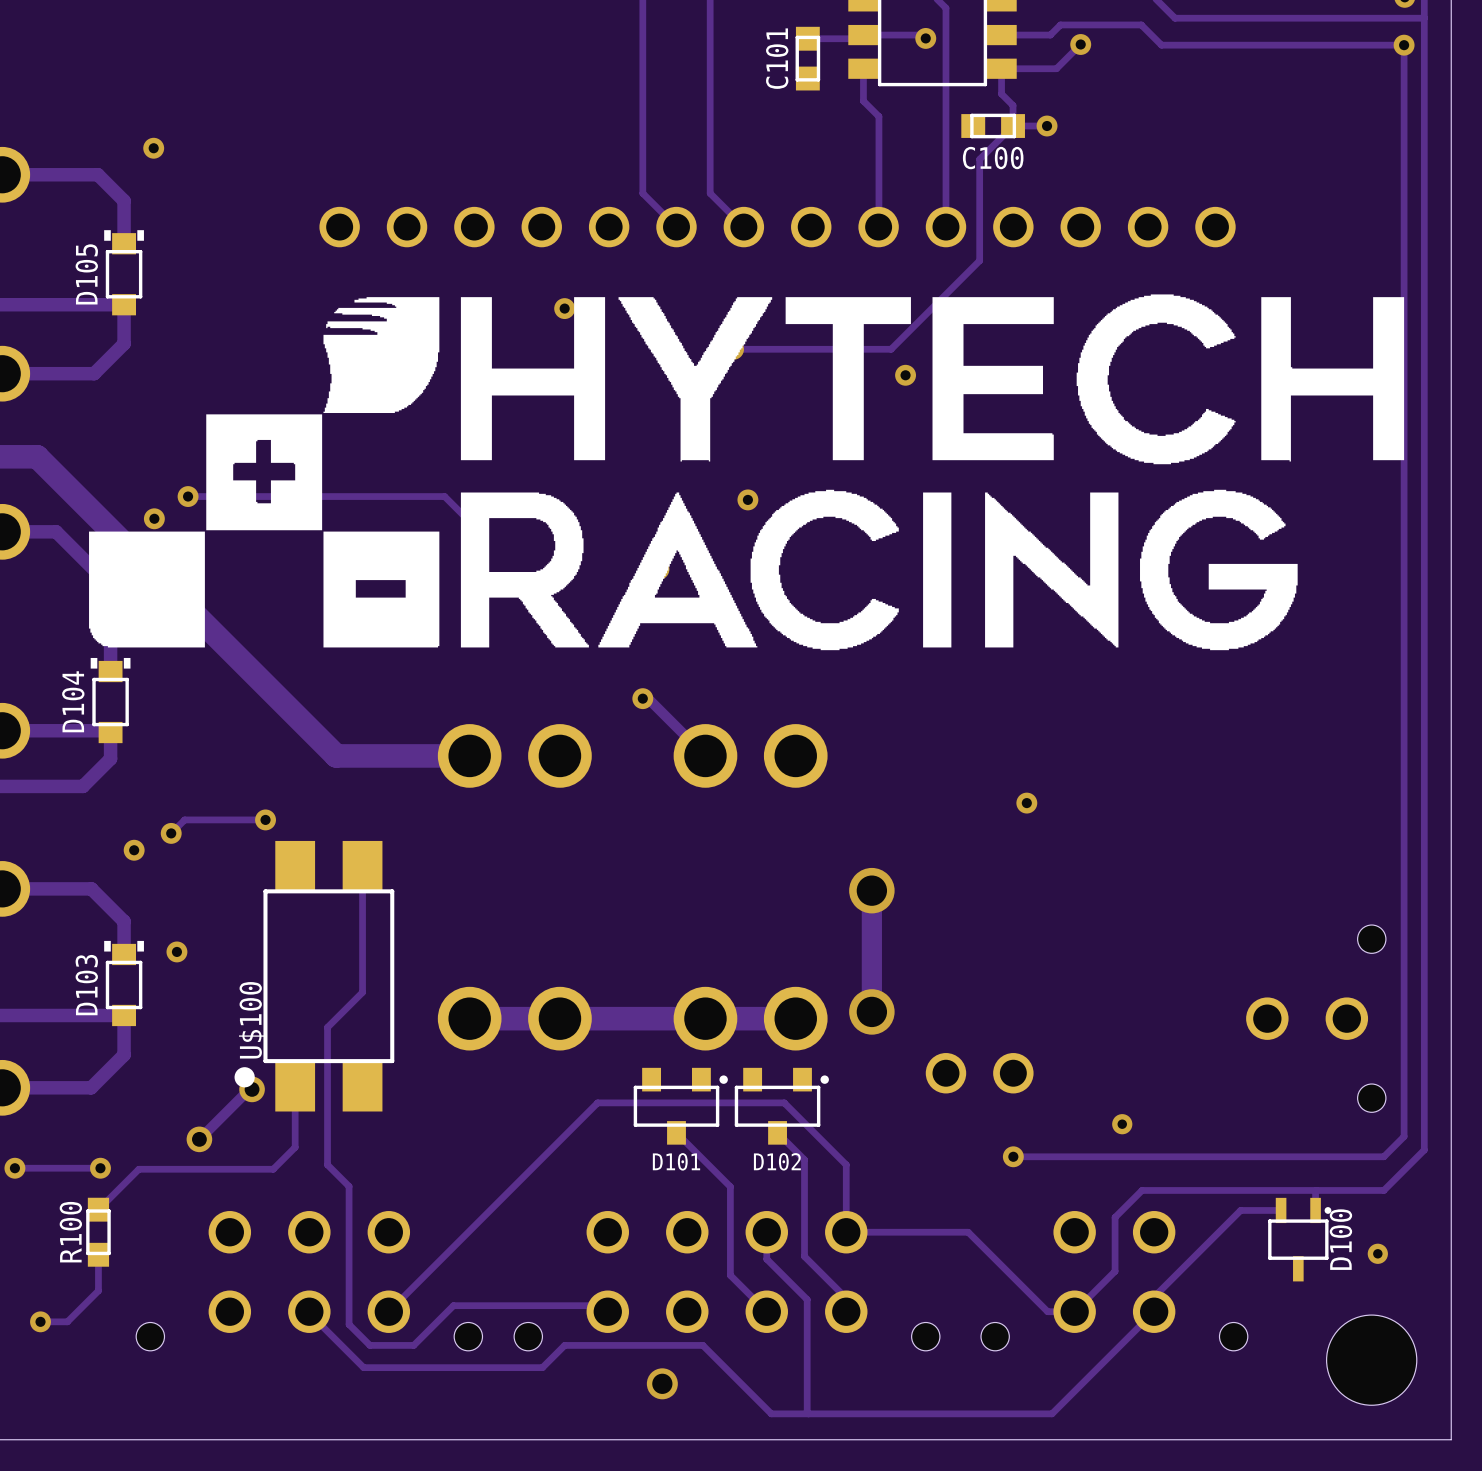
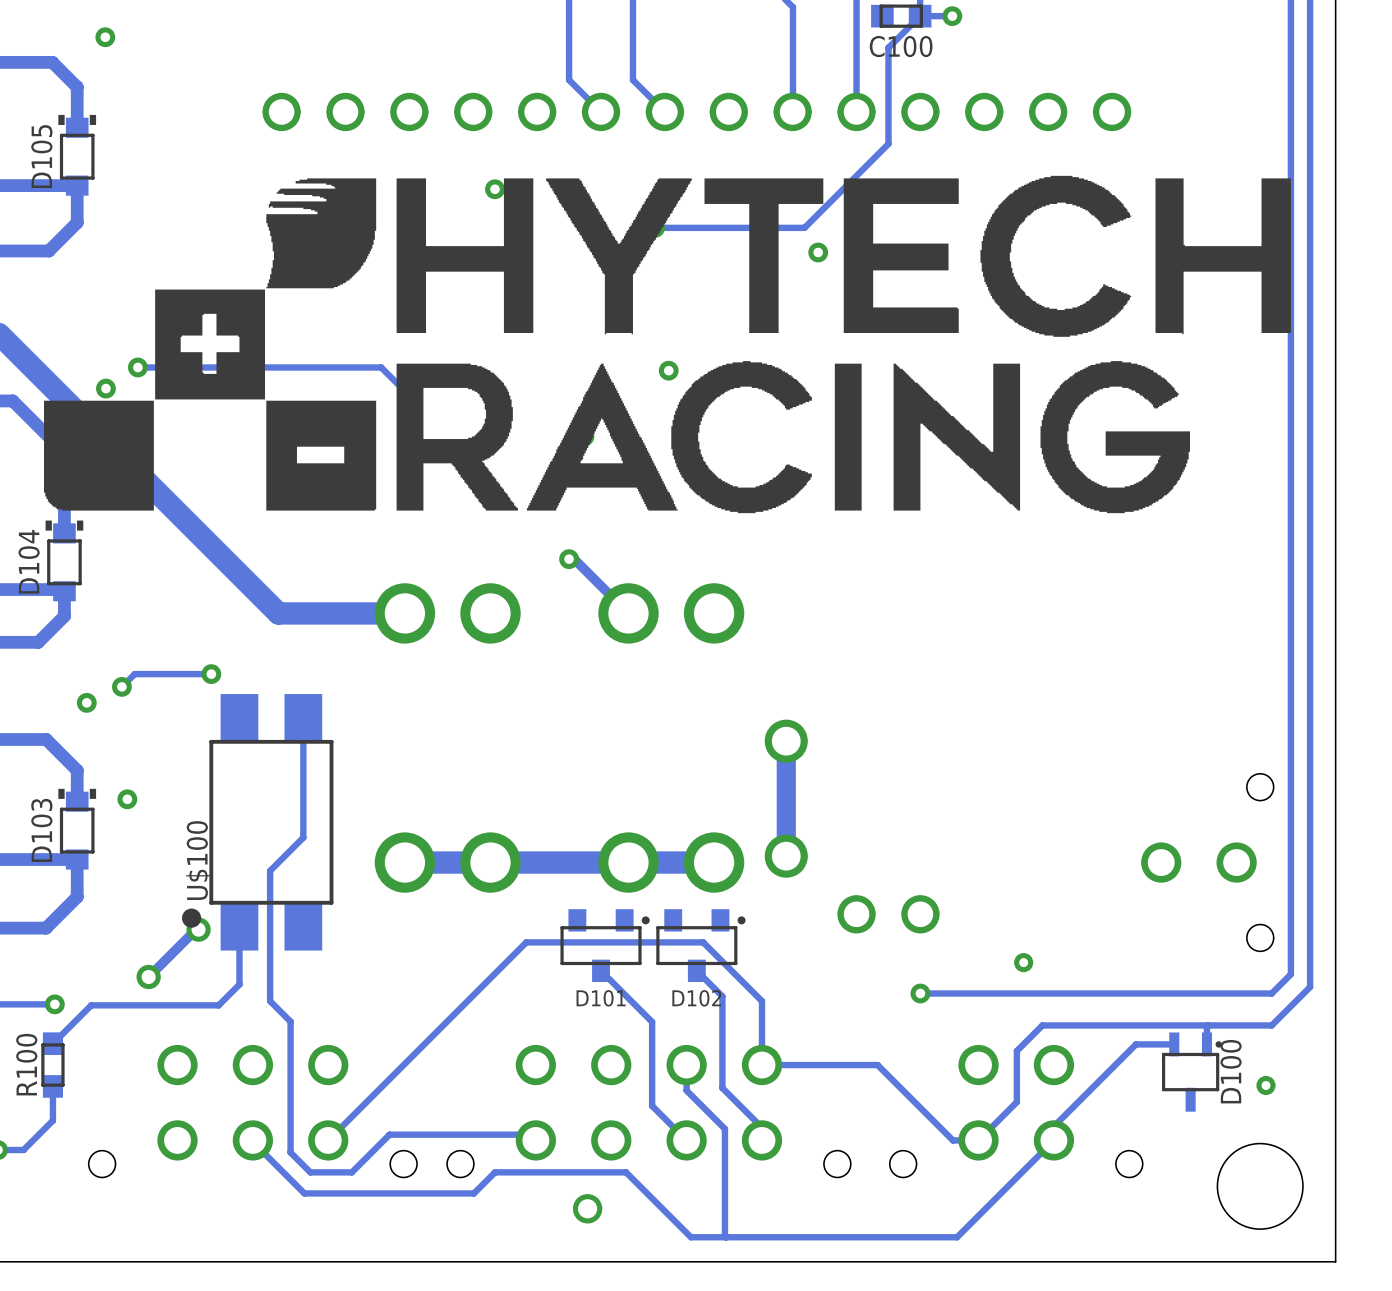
via: (1026, 803) -> none

